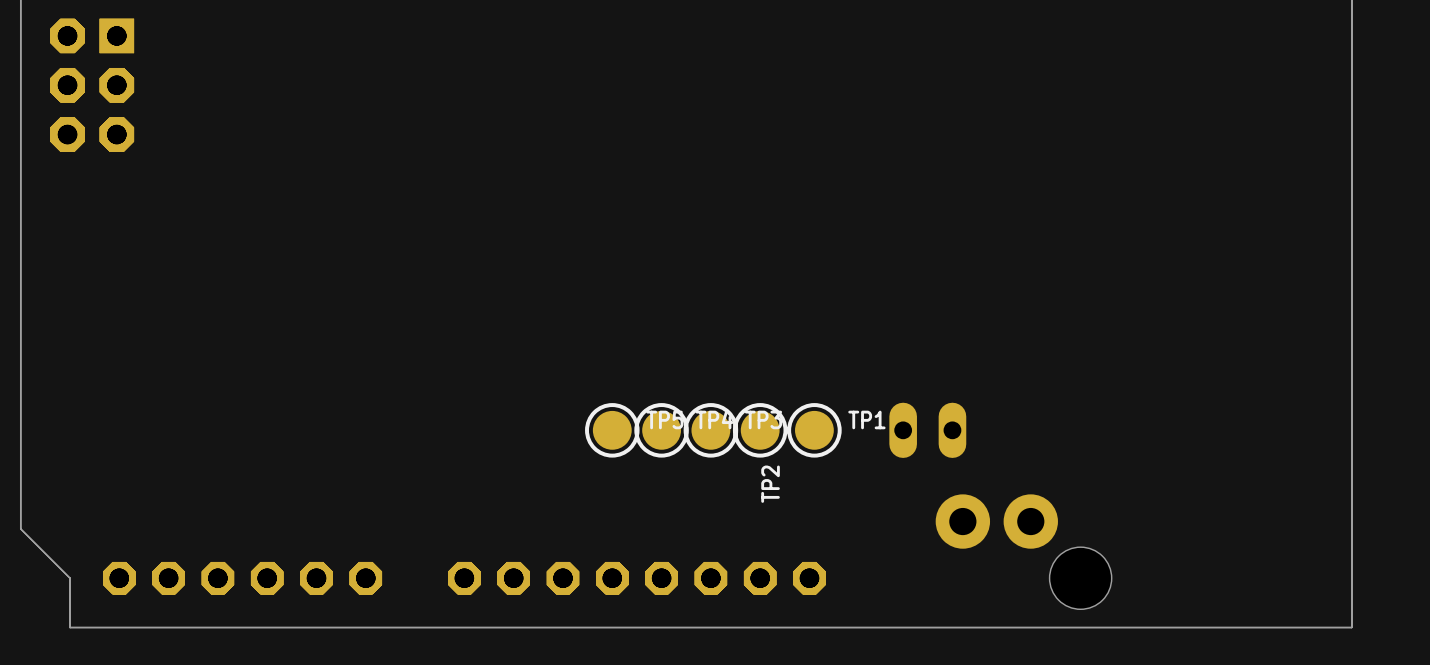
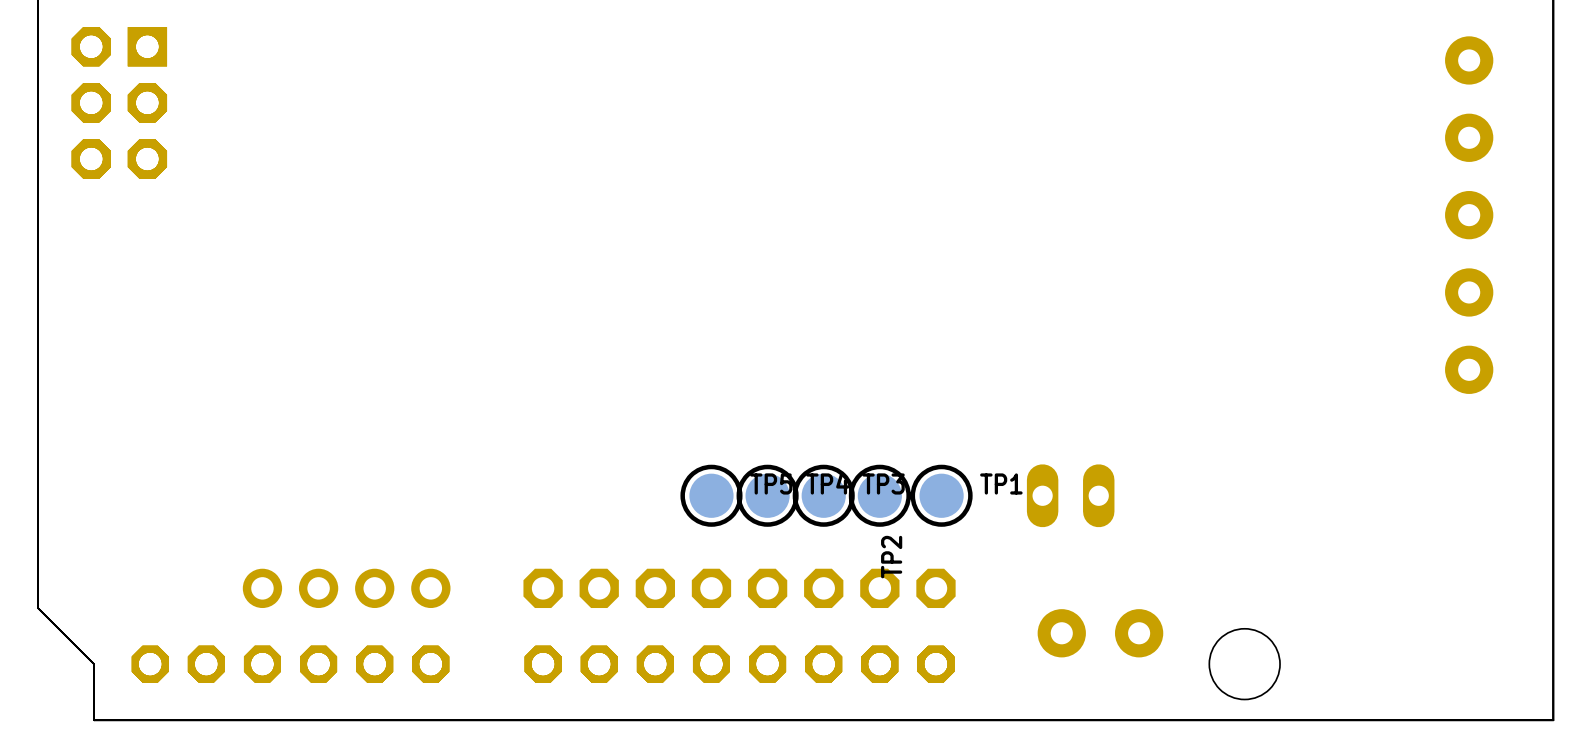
part: none -> (1469, 215)
part: none -> (346, 588)
part: none -> (739, 588)
part: (996, 521) -> none
part: none -> (1100, 633)

